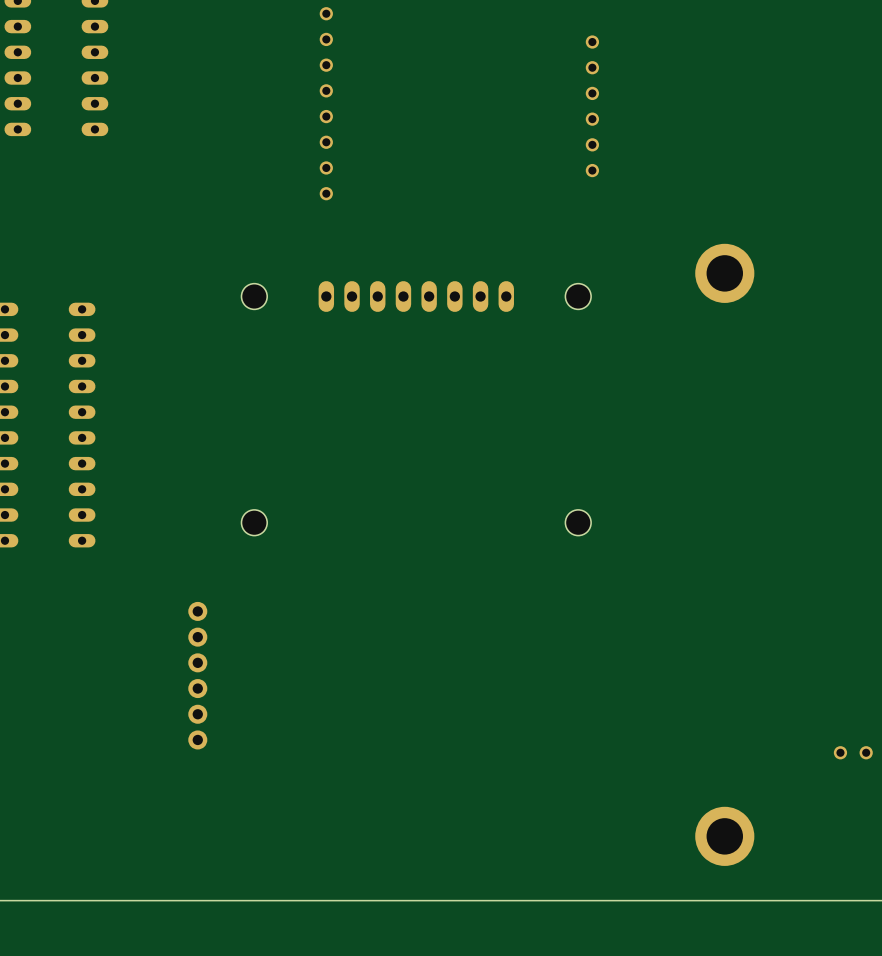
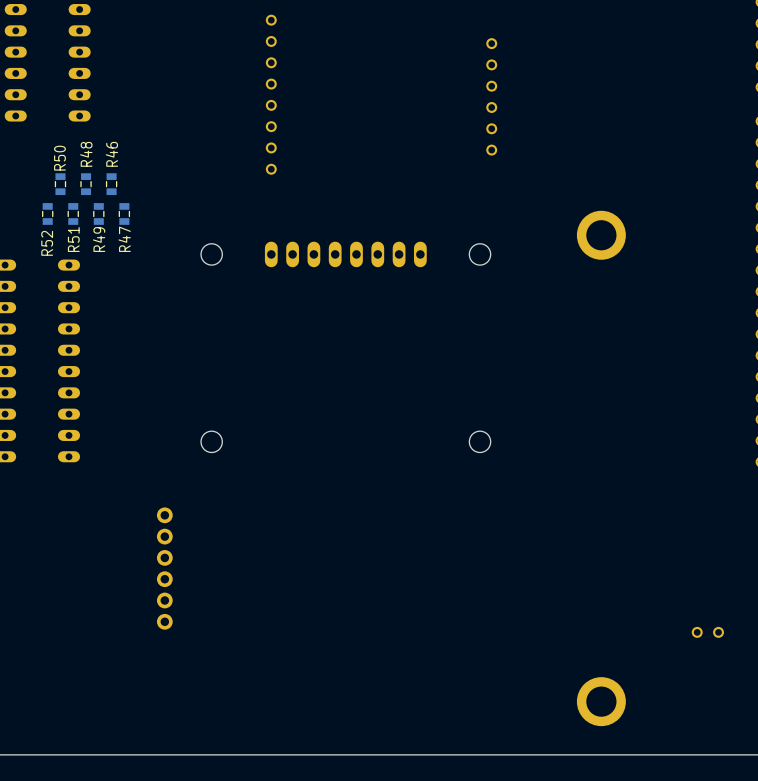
R50: none -> (60, 184)
R48: none -> (86, 184)
R46: none -> (111, 184)
R52: none -> (47, 213)
R51: none -> (73, 213)
R49: none -> (98, 213)
R47: none -> (124, 213)

